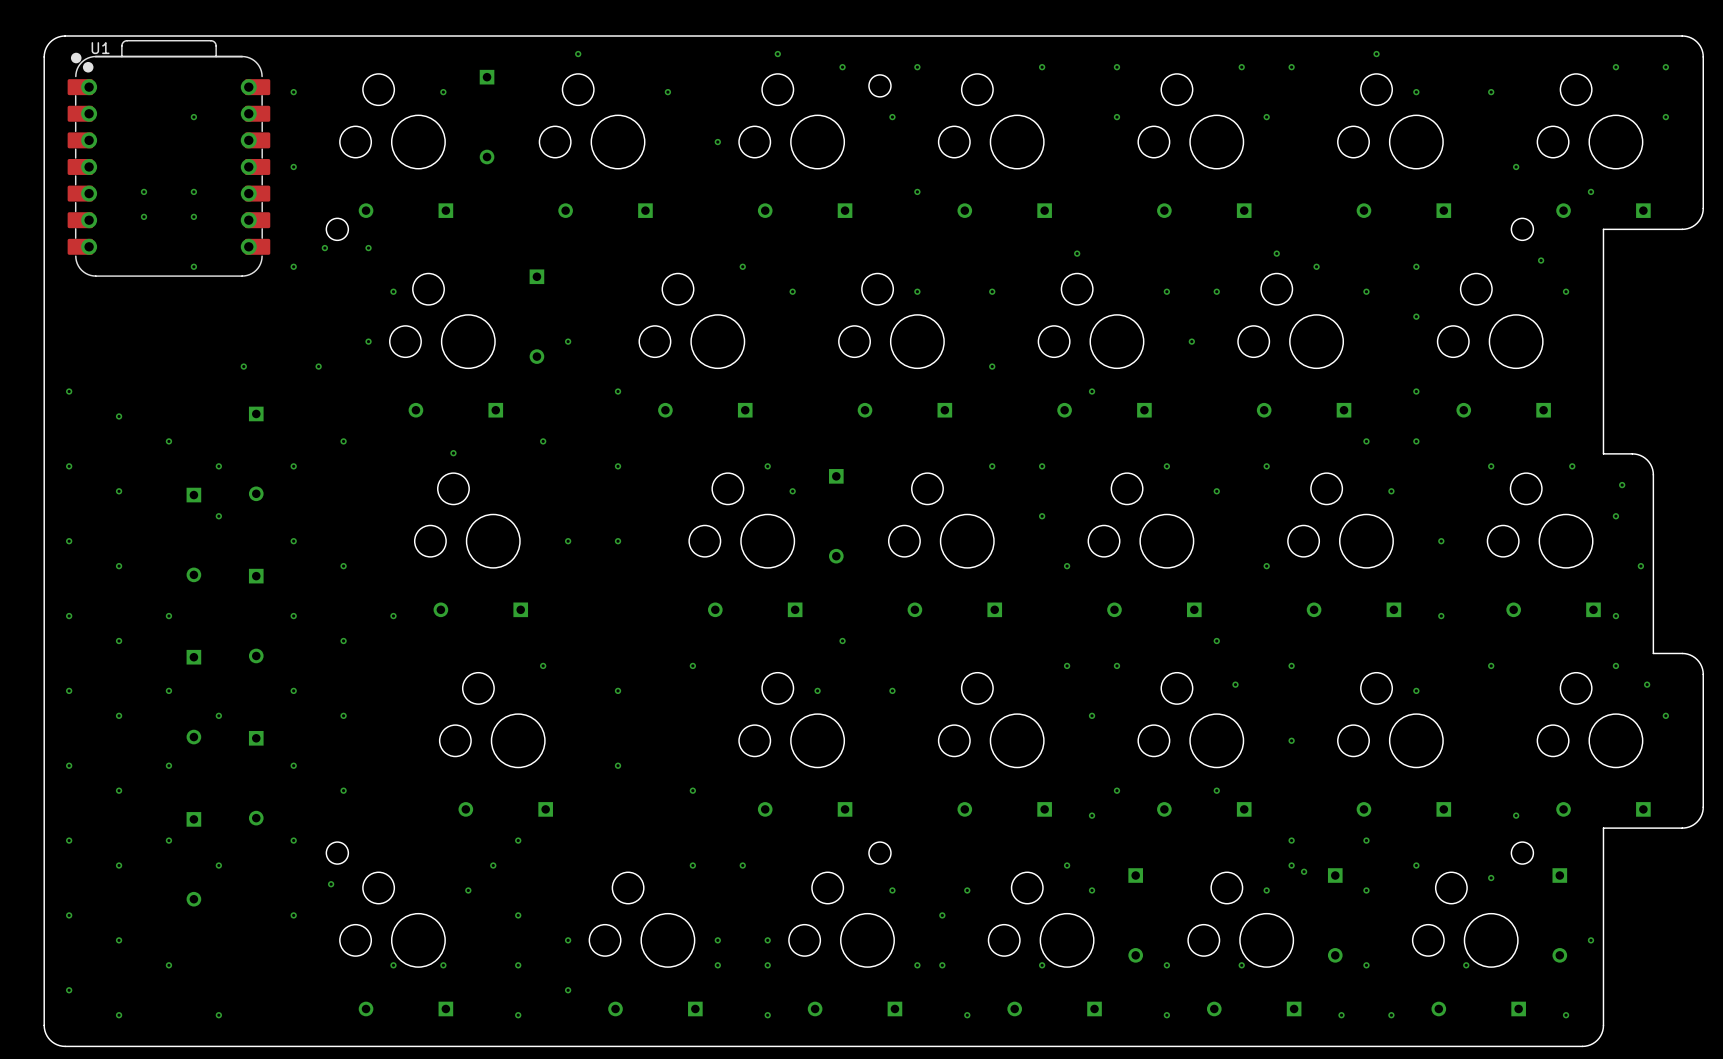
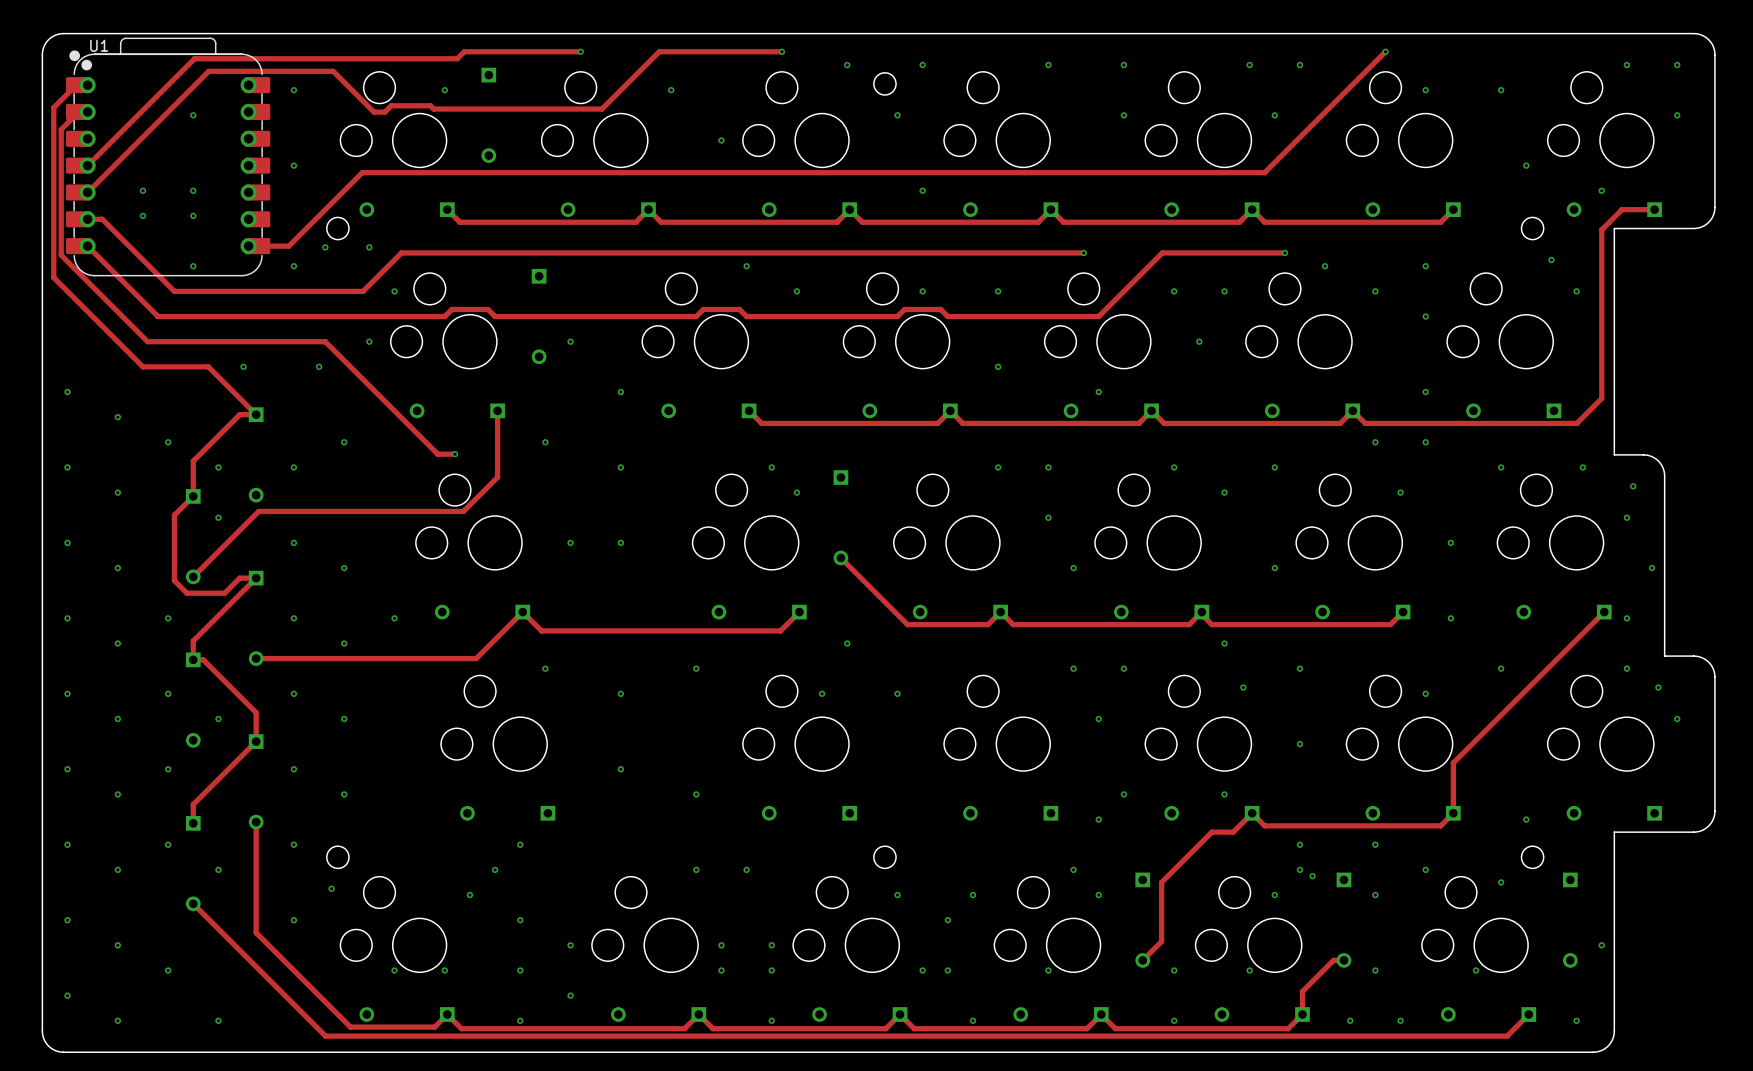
track: none -> (580, 51) (464, 51) (457, 58) (194, 58) (87, 165)
track: none -> (781, 51) (659, 51) (601, 109) (433, 109) (430, 105) (391, 105) (384, 112) (374, 112) (333, 71) (208, 71) (87, 192)
track: none -> (1385, 51) (1264, 172) (362, 172) (288, 246) (257, 246)
track: none -> (87, 85) (76, 85) (53, 107) (53, 277) (142, 366) (208, 366) (256, 414) (239, 414) (193, 461) (193, 496) (174, 515) (174, 580) (186, 593) (224, 593) (239, 578) (256, 578) (193, 641) (193, 659) (203, 659) (256, 712) (256, 741) (193, 804) (193, 823)
track: none -> (78, 111) (61, 129) (61, 255) (147, 341) (325, 341) (437, 454) (454, 454)
track: none -> (447, 209) (459, 222) (635, 222) (648, 209) (661, 222) (837, 222) (849, 209) (862, 222) (1038, 222) (1050, 209) (1063, 222) (1239, 222) (1252, 209) (1264, 222) (1440, 222) (1453, 209)
track: none -> (1654, 209) (1621, 209) (1601, 229) (1601, 398) (1576, 423) (1365, 423) (1352, 410) (1340, 423) (1164, 423) (1151, 410) (1138, 423) (962, 423) (950, 410) (937, 423) (761, 423) (749, 410)
track: none -> (87, 219) (102, 219) (174, 291) (363, 291) (401, 252) (1083, 252)
track: none -> (87, 246) (158, 316) (444, 316) (451, 309) (488, 309) (495, 316) (696, 316) (703, 309) (739, 309) (746, 316) (897, 316) (904, 309) (940, 309) (947, 316) (1098, 316) (1162, 252) (1284, 252)
track: none -> (497, 410) (497, 477) (463, 511) (258, 511) (193, 576)
track: none -> (840, 558) (907, 624) (988, 624) (1000, 612) (1013, 624) (1189, 624) (1201, 612) (1201, 614) (1211, 624) (1390, 624) (1403, 612)
track: none -> (799, 612) (780, 630) (541, 630) (522, 612) (476, 658) (256, 658)
track: none -> (1601, 612) (1604, 612) (1453, 762) (1453, 813) (1440, 825) (1264, 825) (1252, 813) (1233, 832) (1211, 832) (1161, 882) (1161, 941) (1142, 960)
track: none -> (256, 822) (256, 932) (350, 1027) (434, 1027) (447, 1014) (461, 1028) (684, 1028) (698, 1014) (713, 1028) (885, 1028) (900, 1014) (914, 1028) (1087, 1028) (1101, 1014)
track: none -> (193, 903) (325, 1036) (1507, 1036) (1528, 1014)
track: none -> (1343, 960) (1333, 960) (1302, 991) (1302, 1014) (1288, 1028) (1115, 1028) (1101, 1014)

